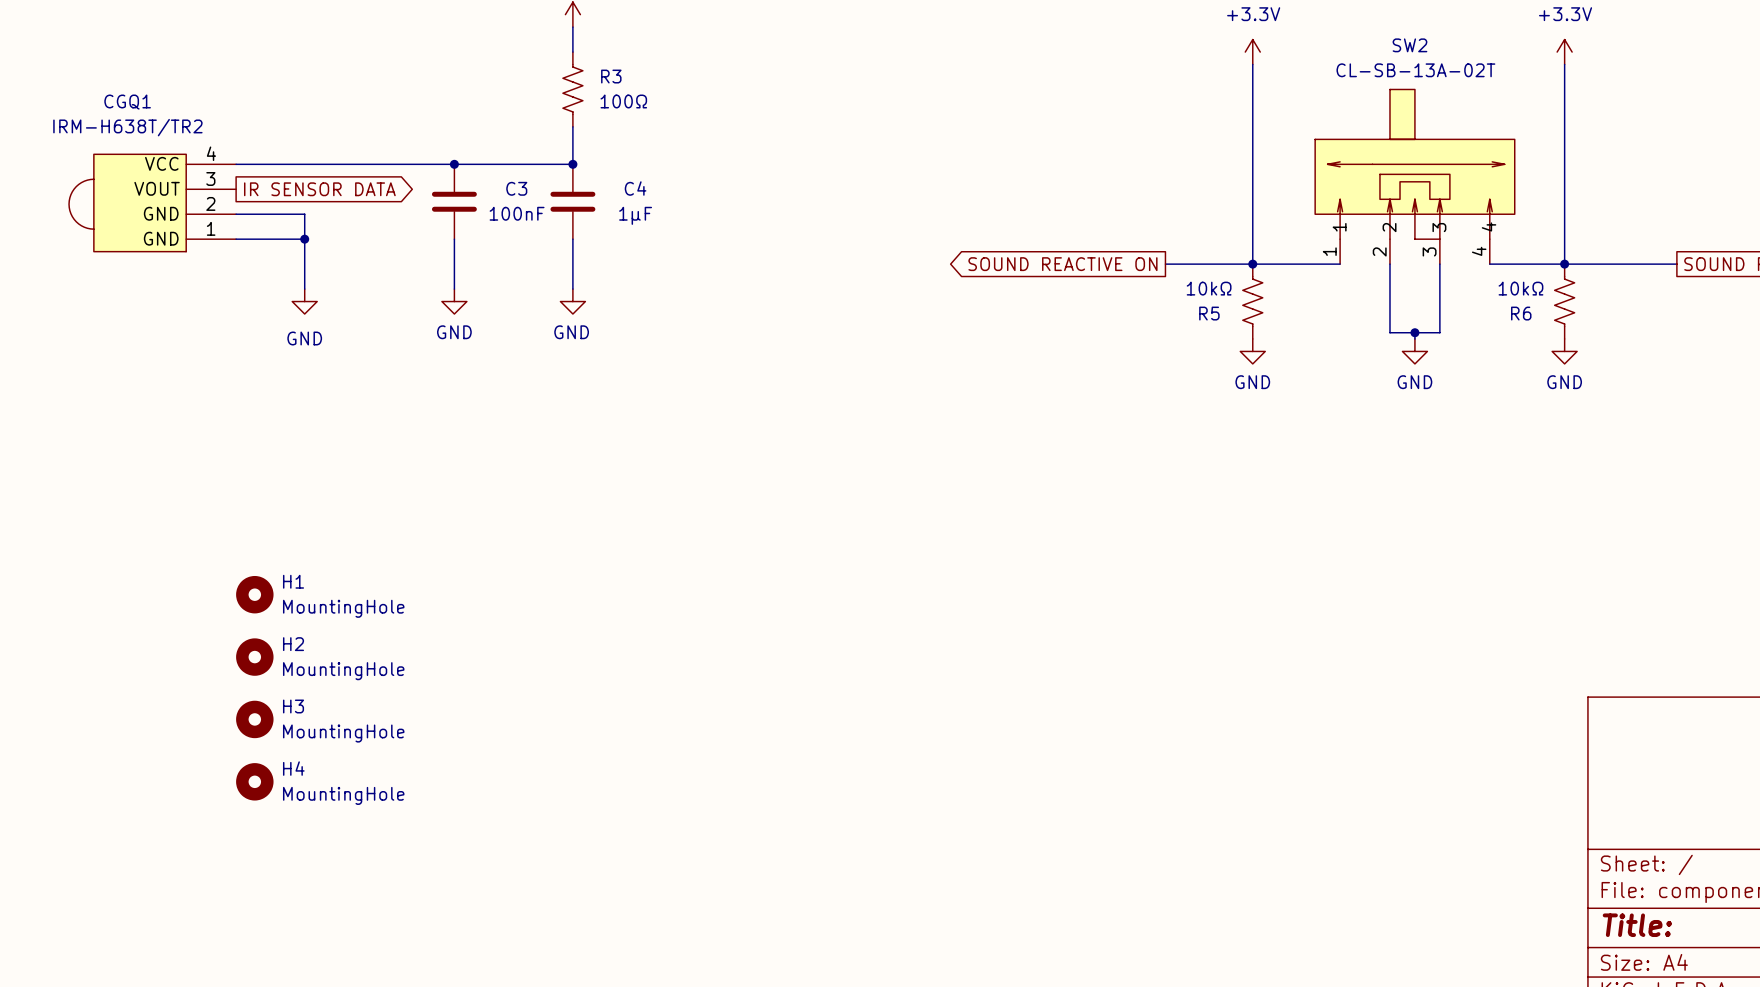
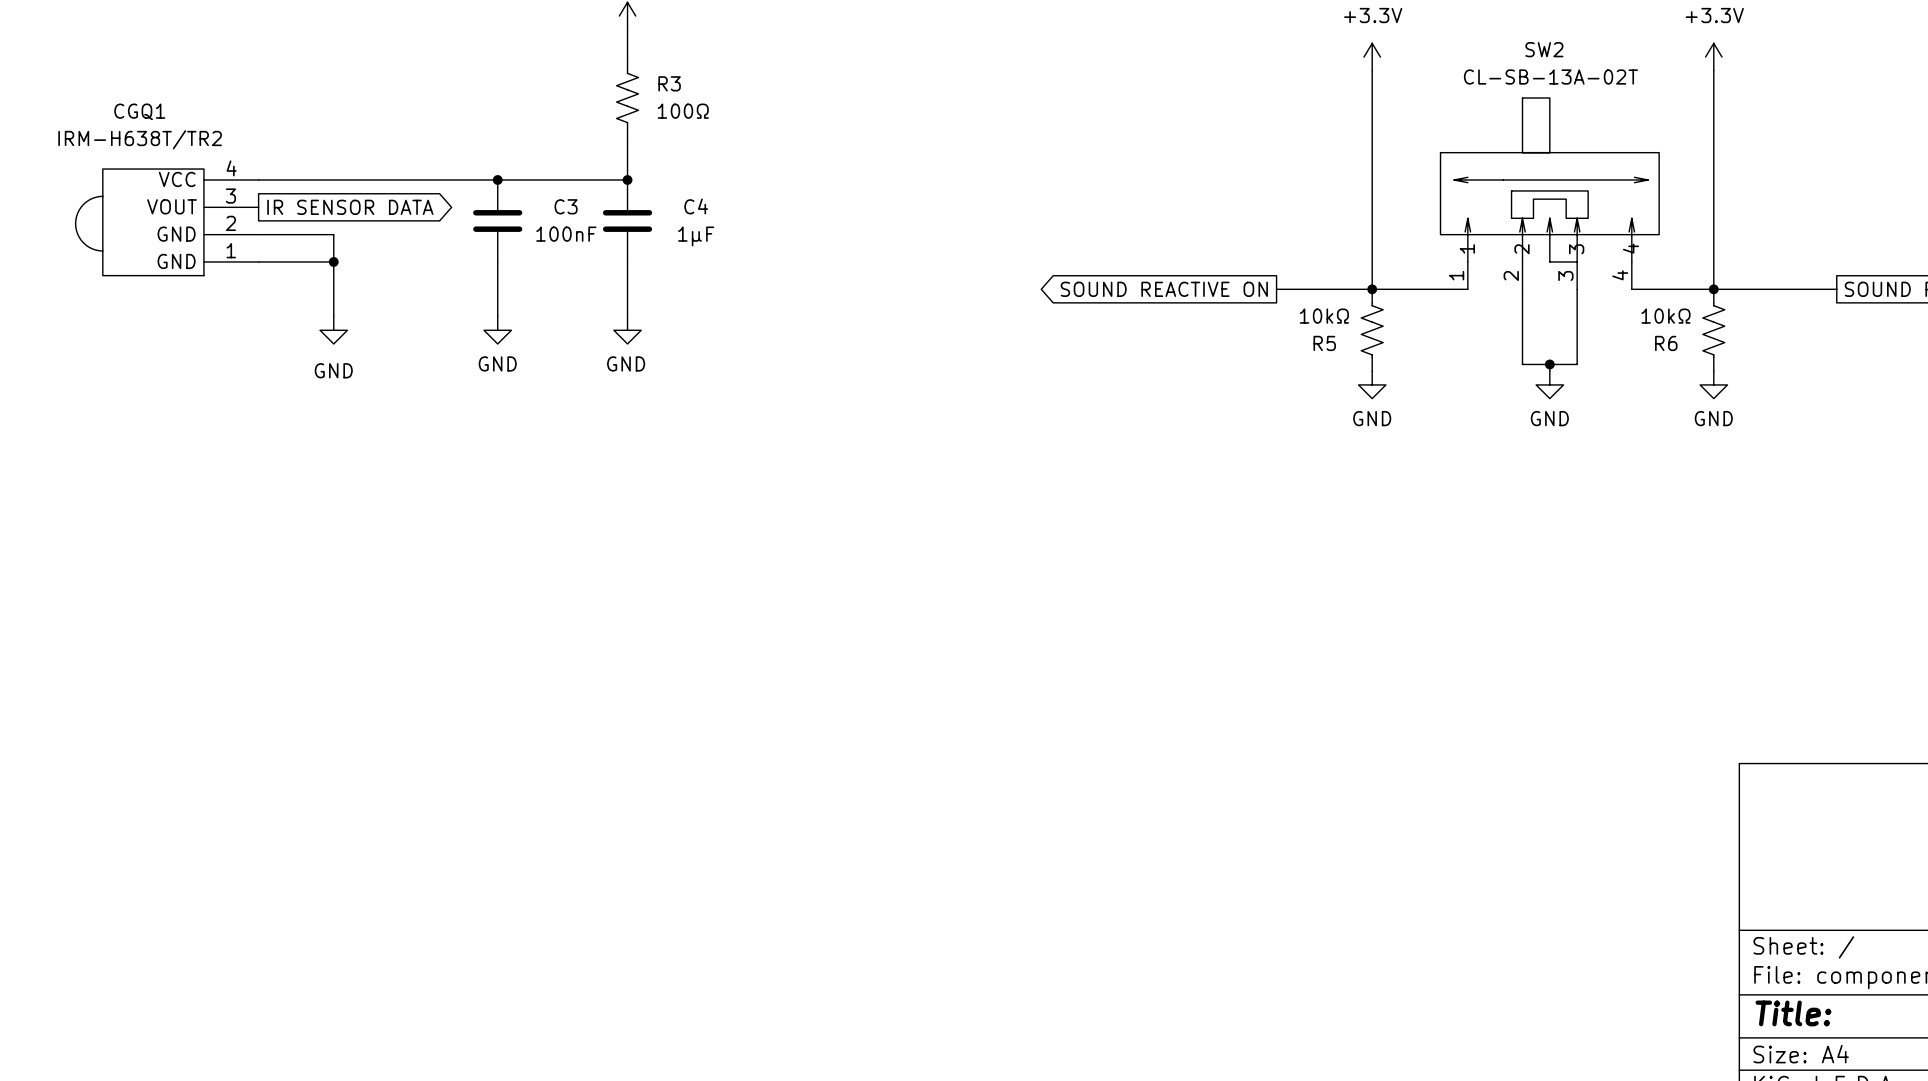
H1: MountingHole (254, 594) -> none
H2: MountingHole (254, 657) -> none
H3: MountingHole (254, 719) -> none
H4: MountingHole (254, 781) -> none

